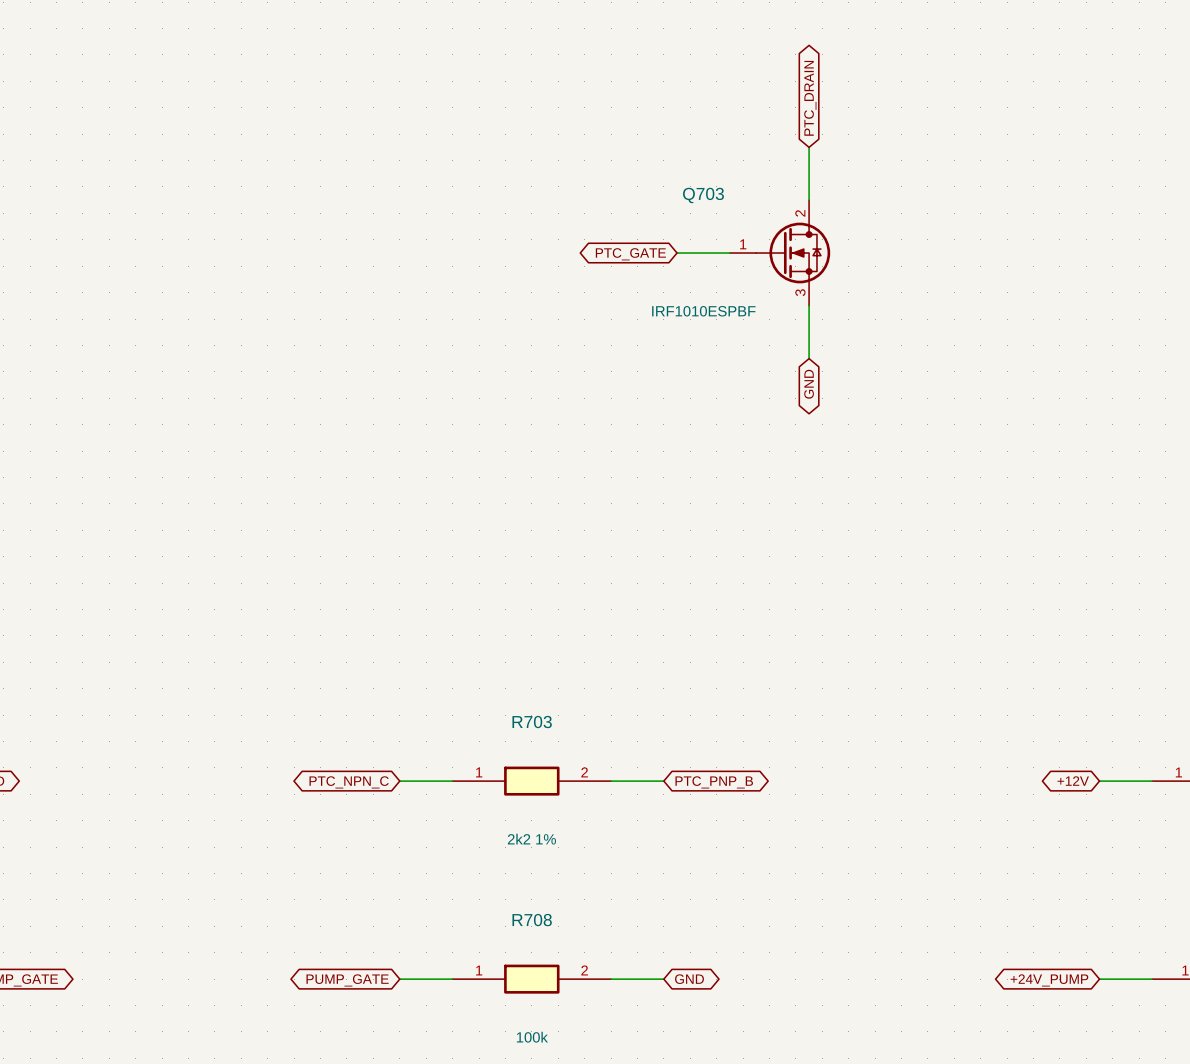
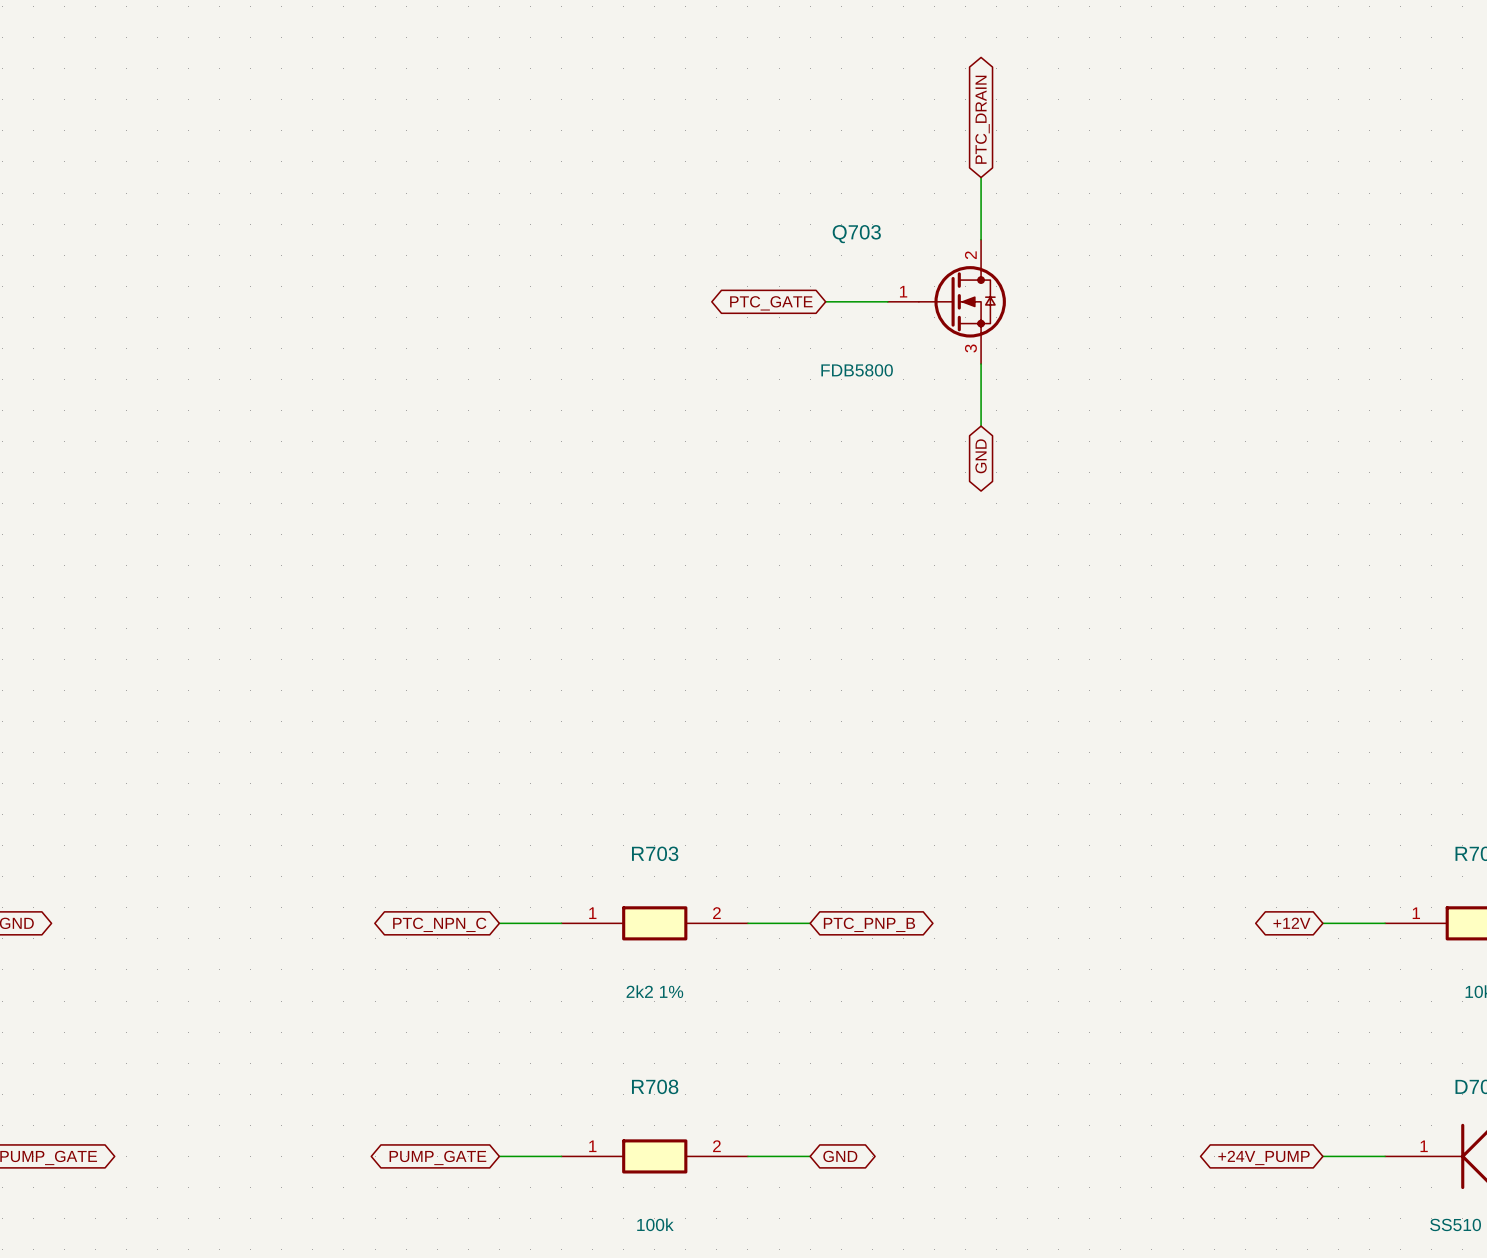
Q703 value: IRF1010ESPBF (703, 311) -> FDB5800 (857, 370)

